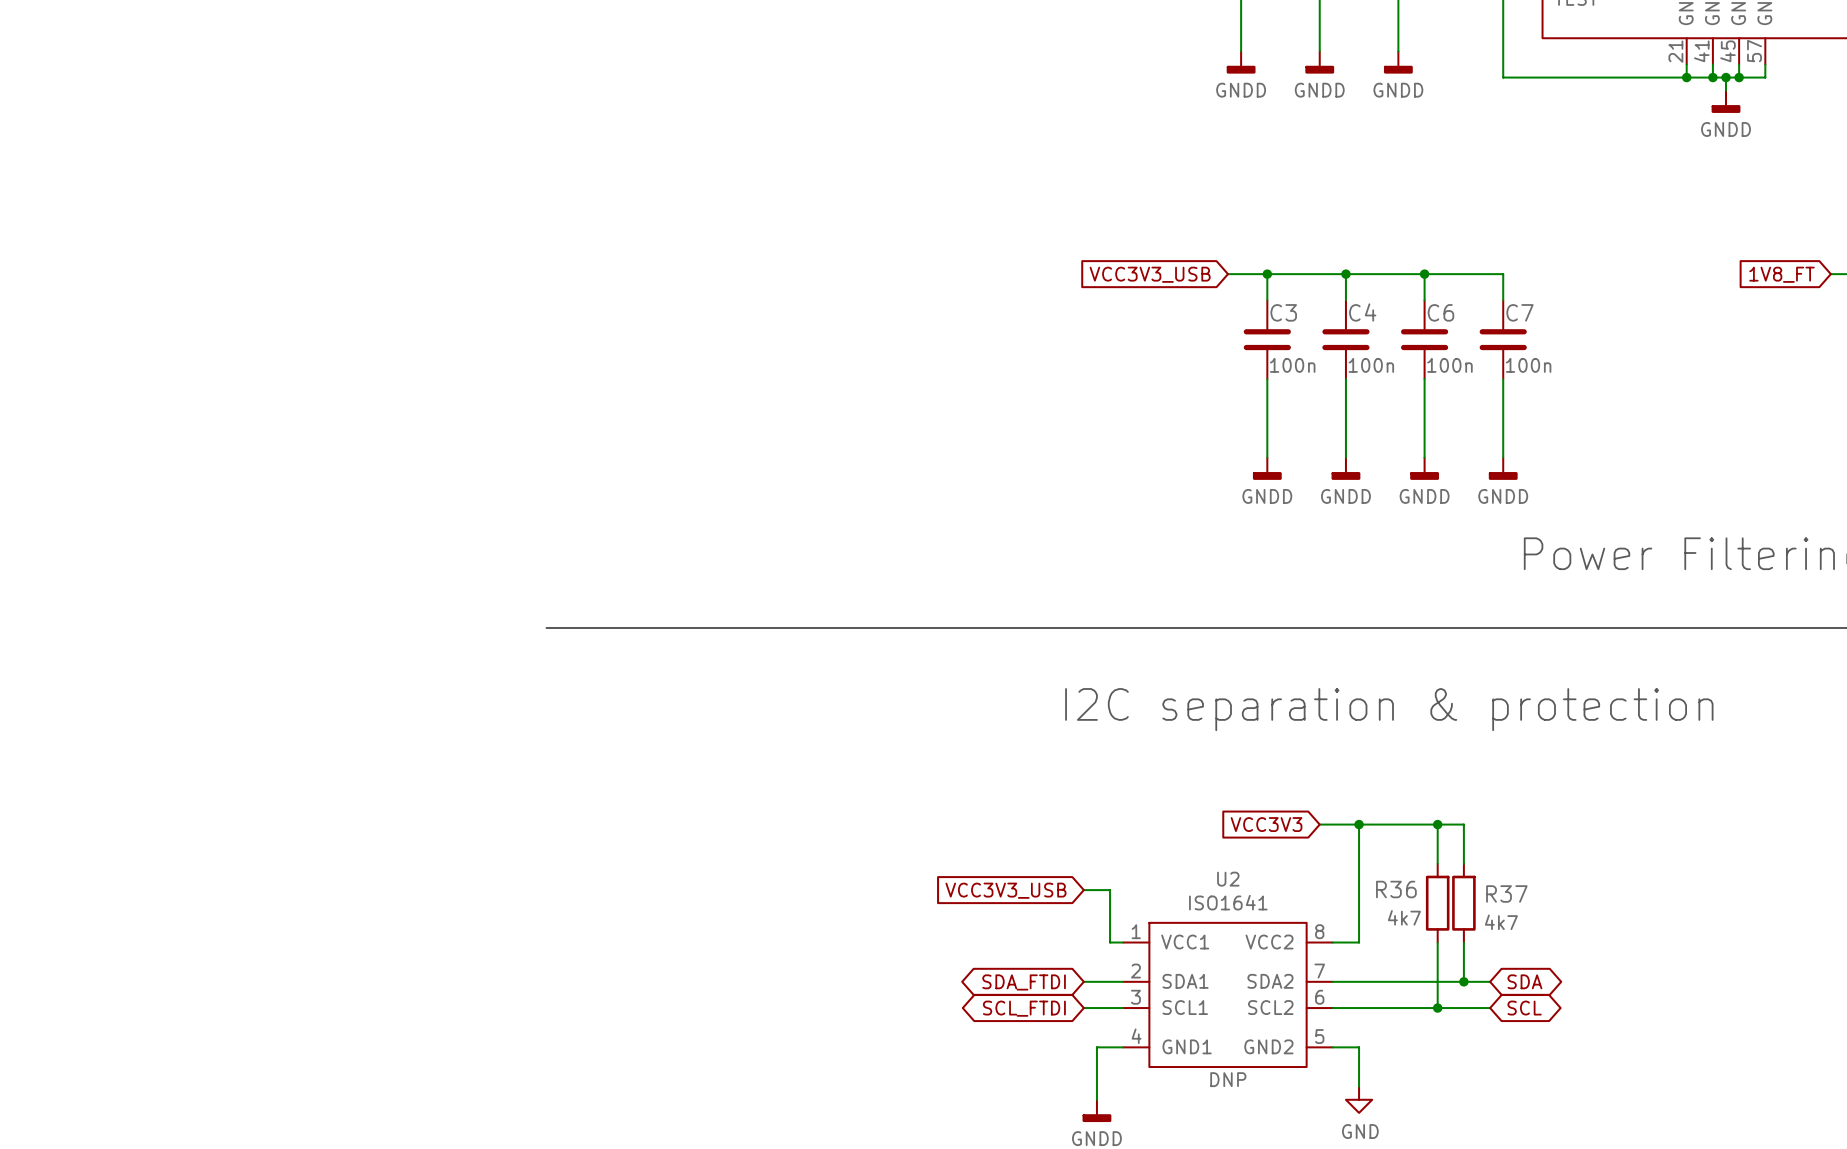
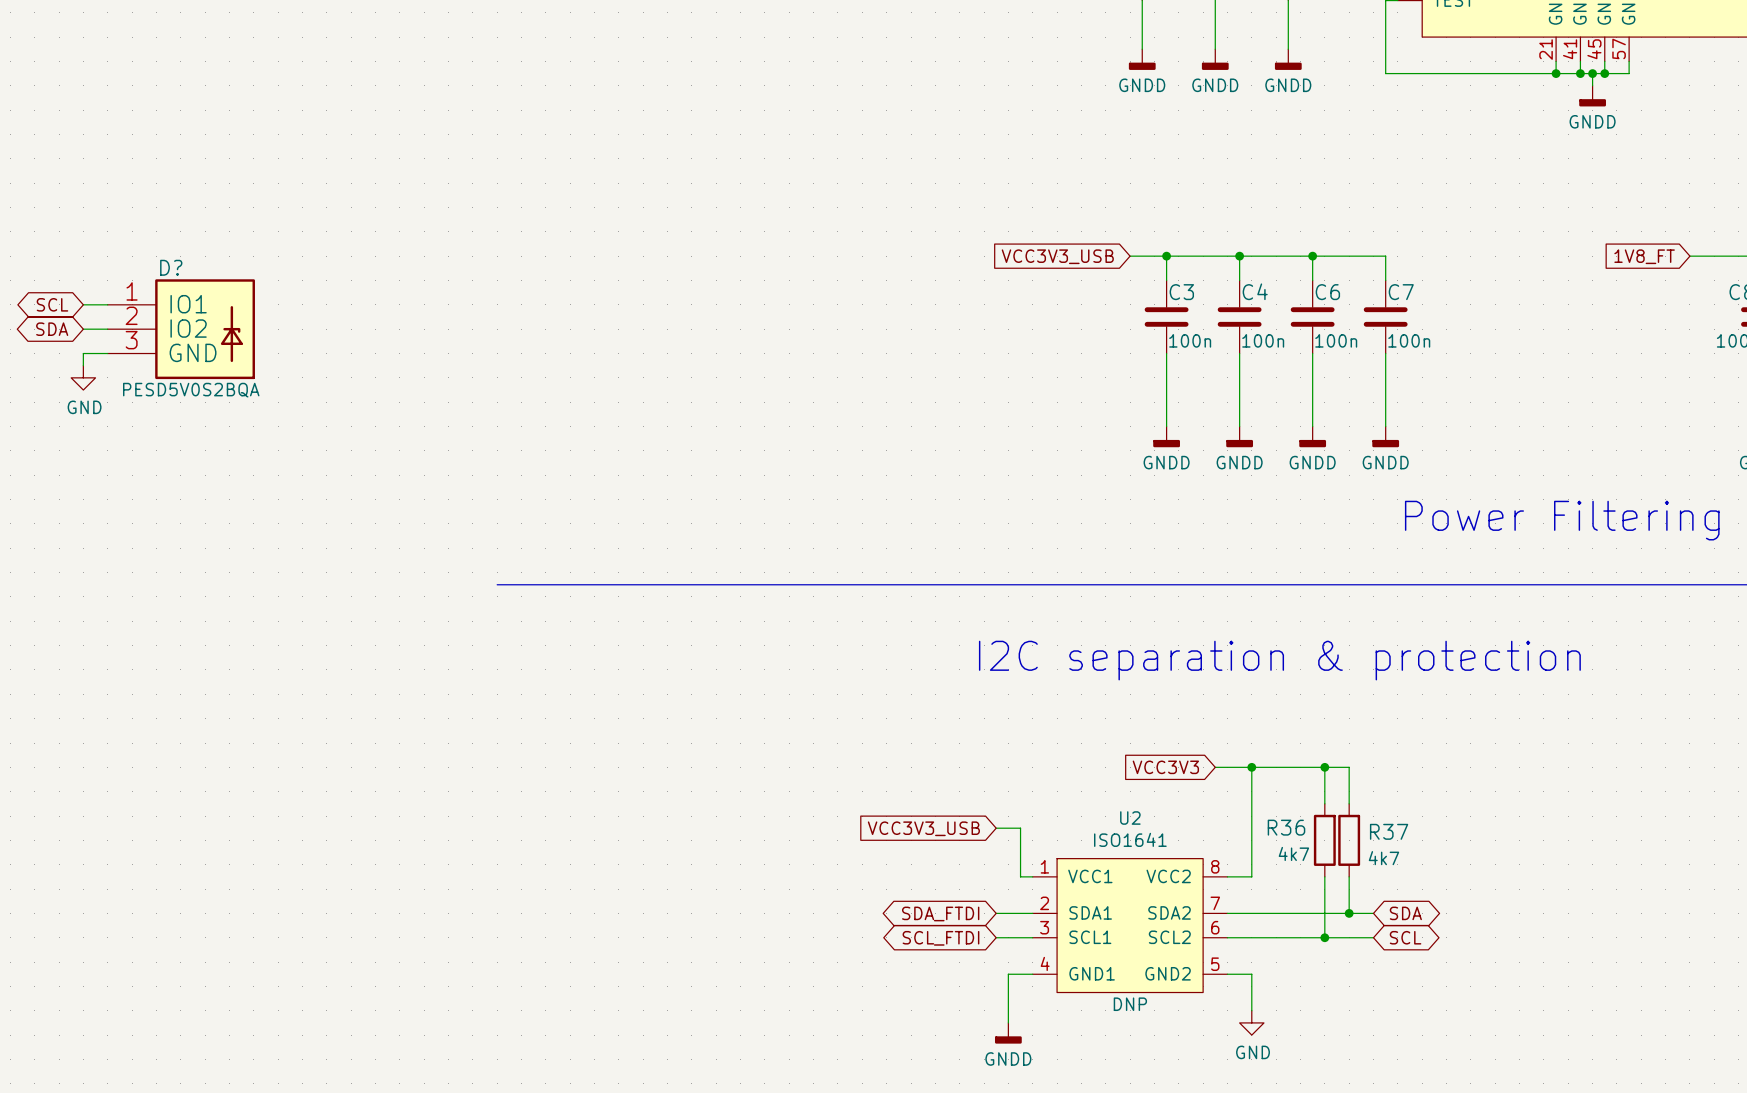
global label: none -> SCL (52, 304)
wire: none -> (83, 304) (107, 304)
global label: none -> SDA (52, 329)
wire: none -> (83, 329) (107, 329)
D?: none -> (181, 329)
wire: none -> (107, 353) (83, 353) (83, 365)
power symbol: none -> GND (83, 377)

